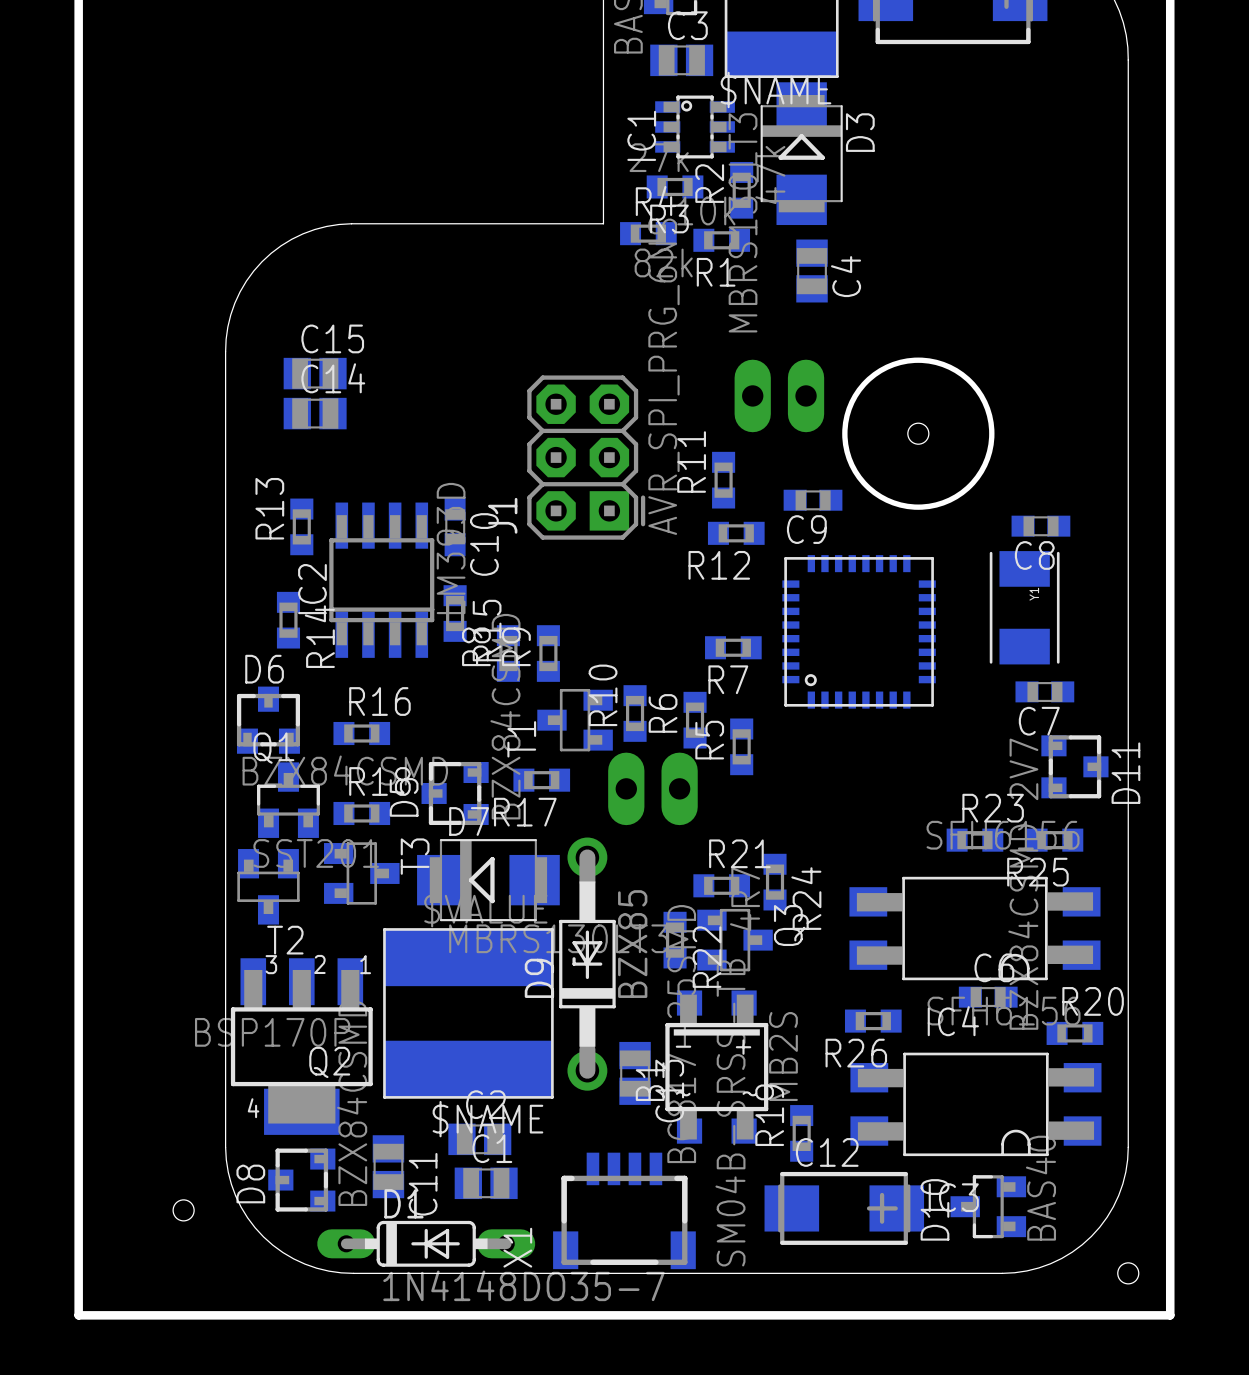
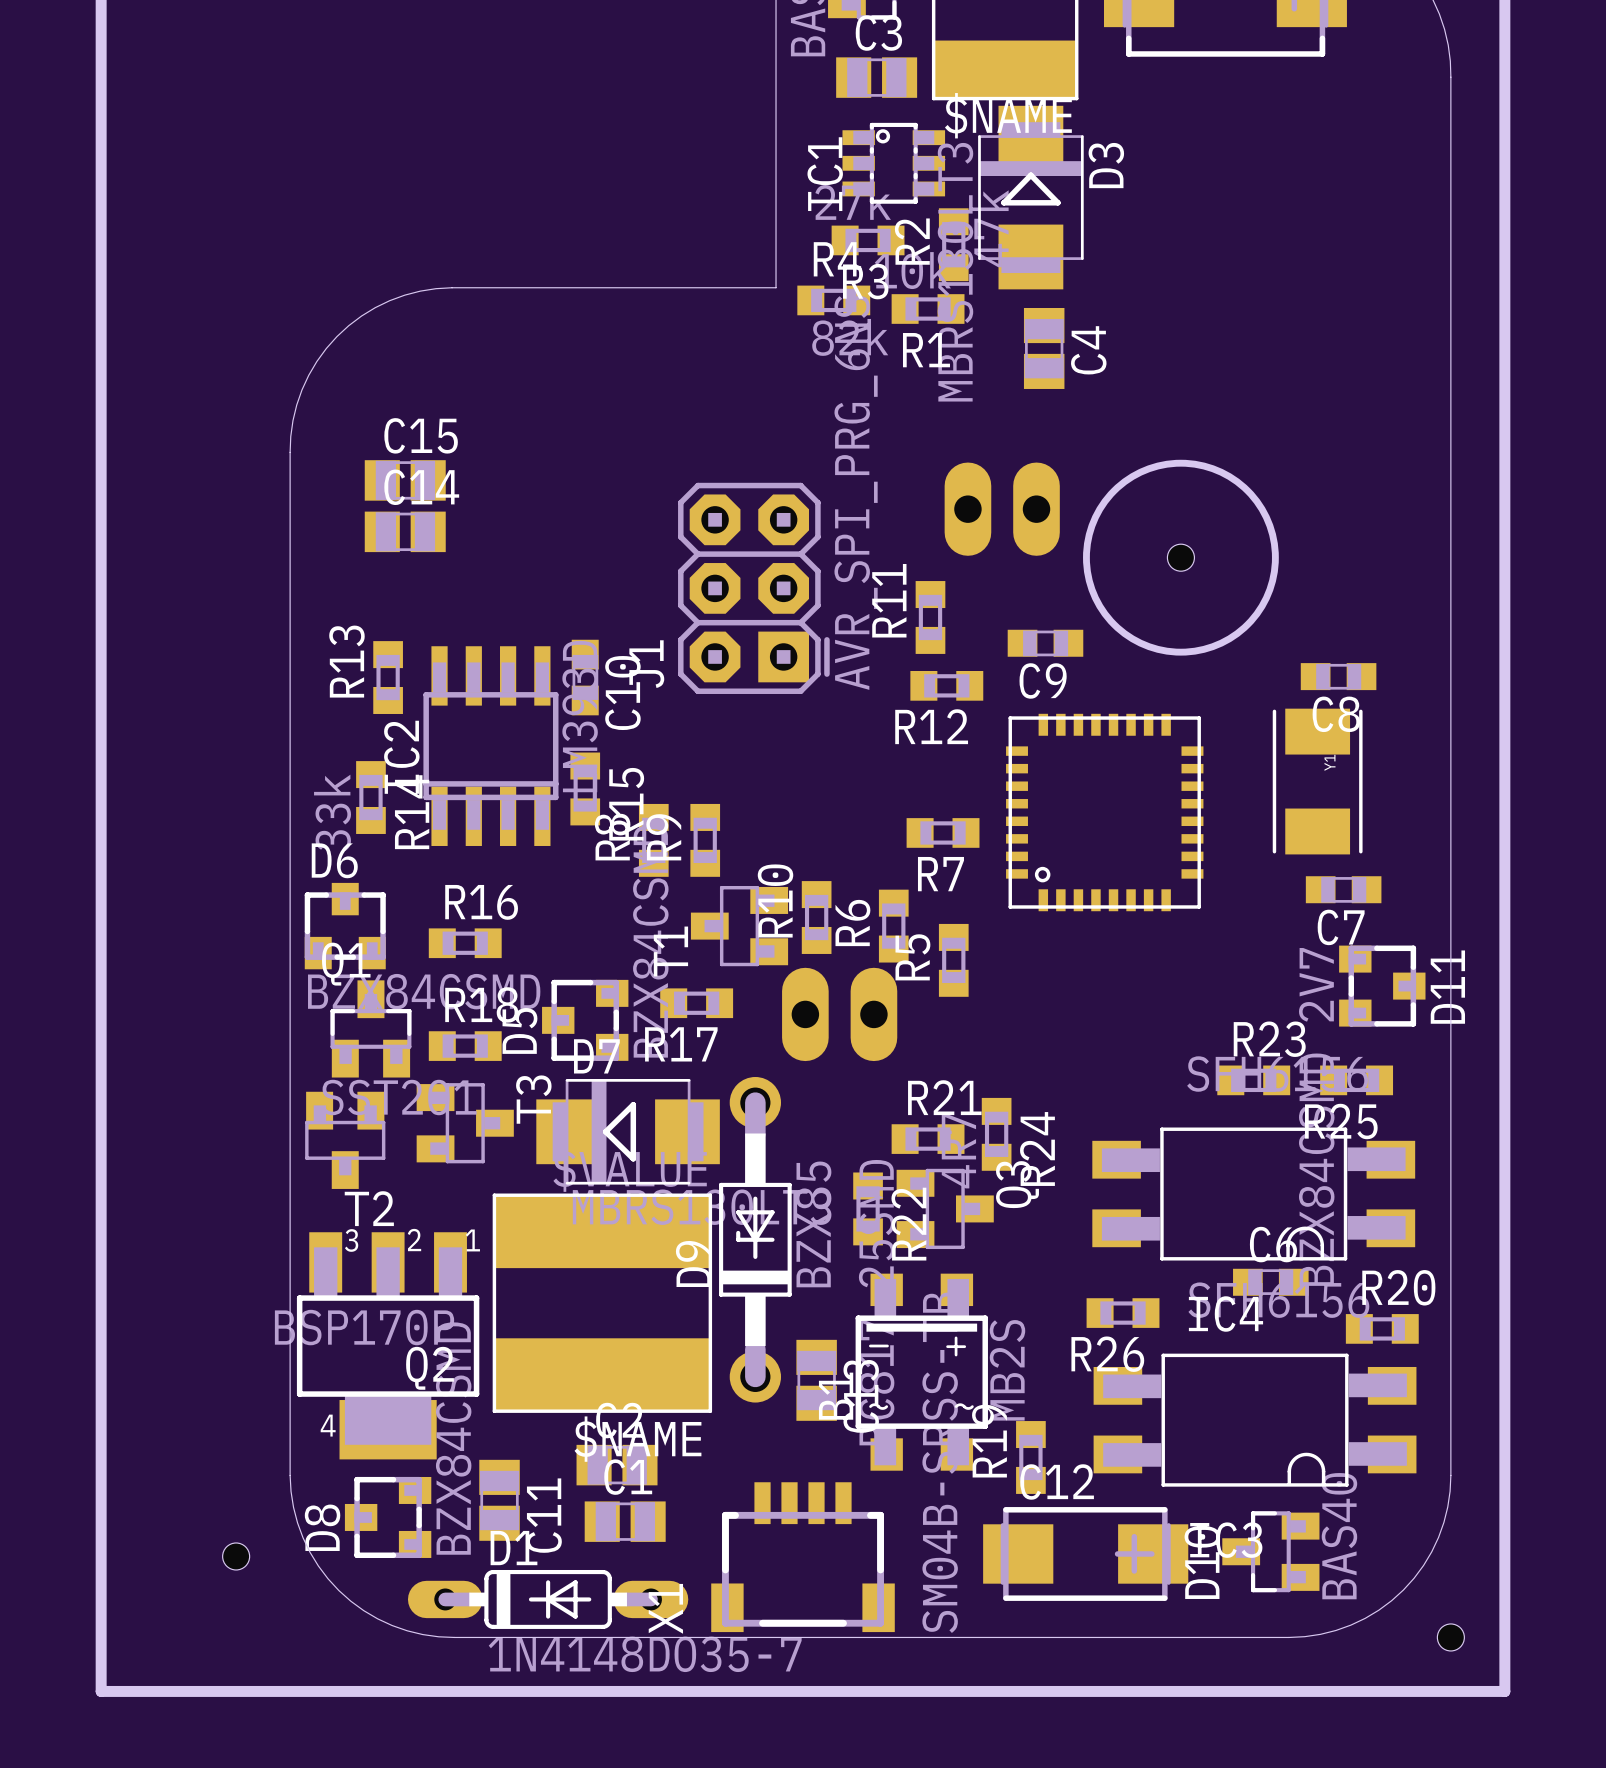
R14 value: none -> 33k (332, 812)

